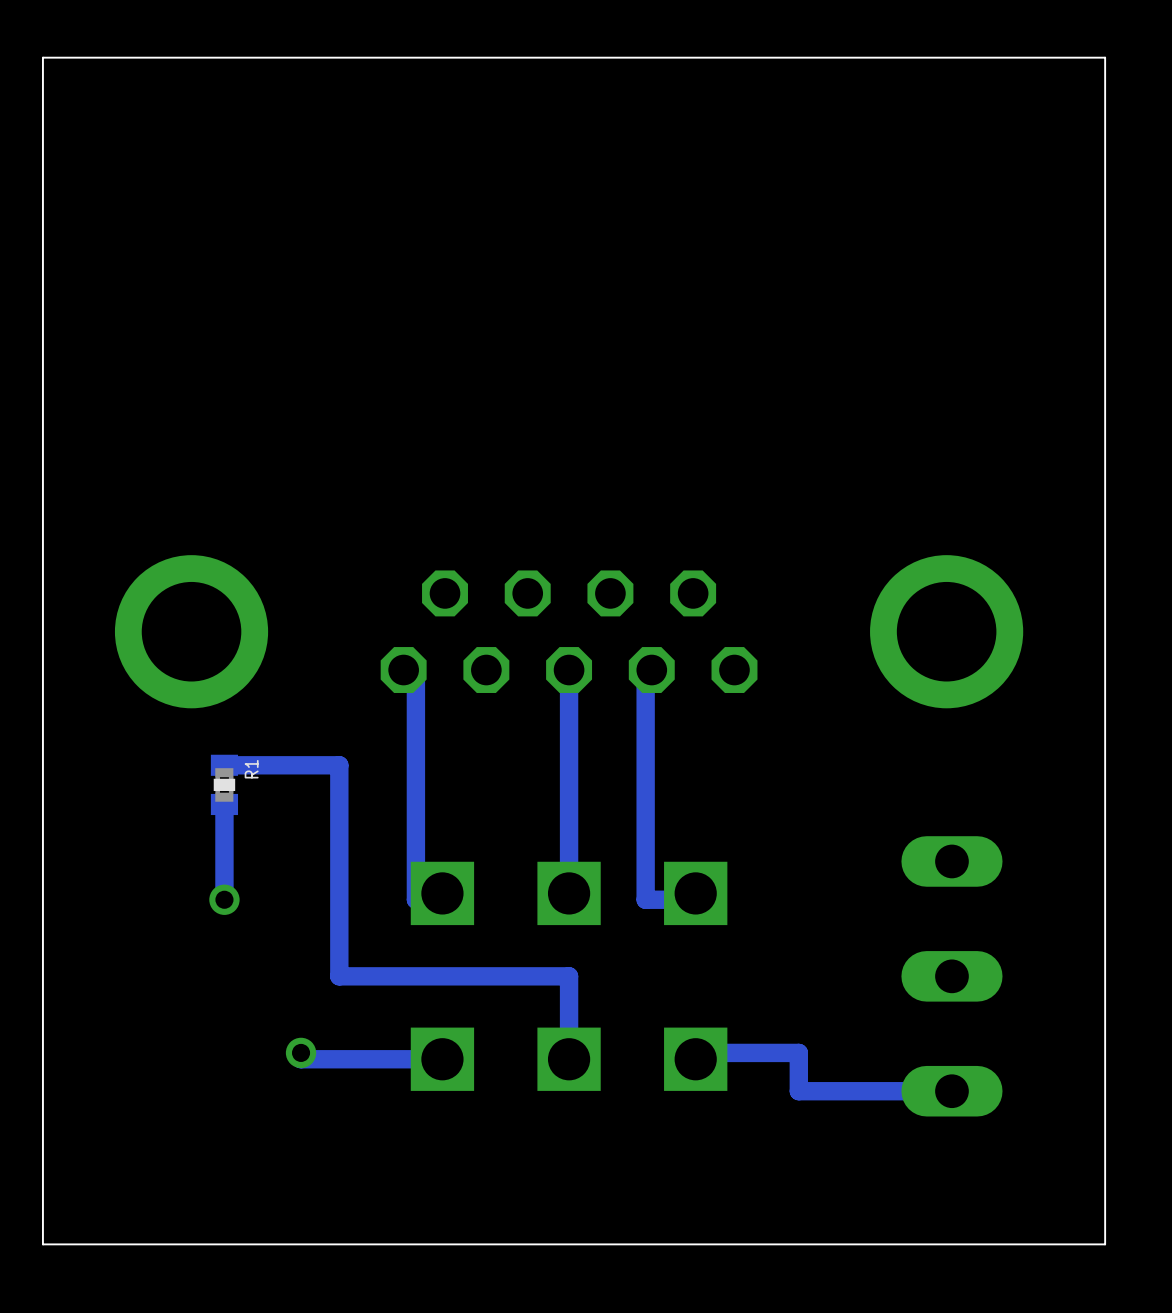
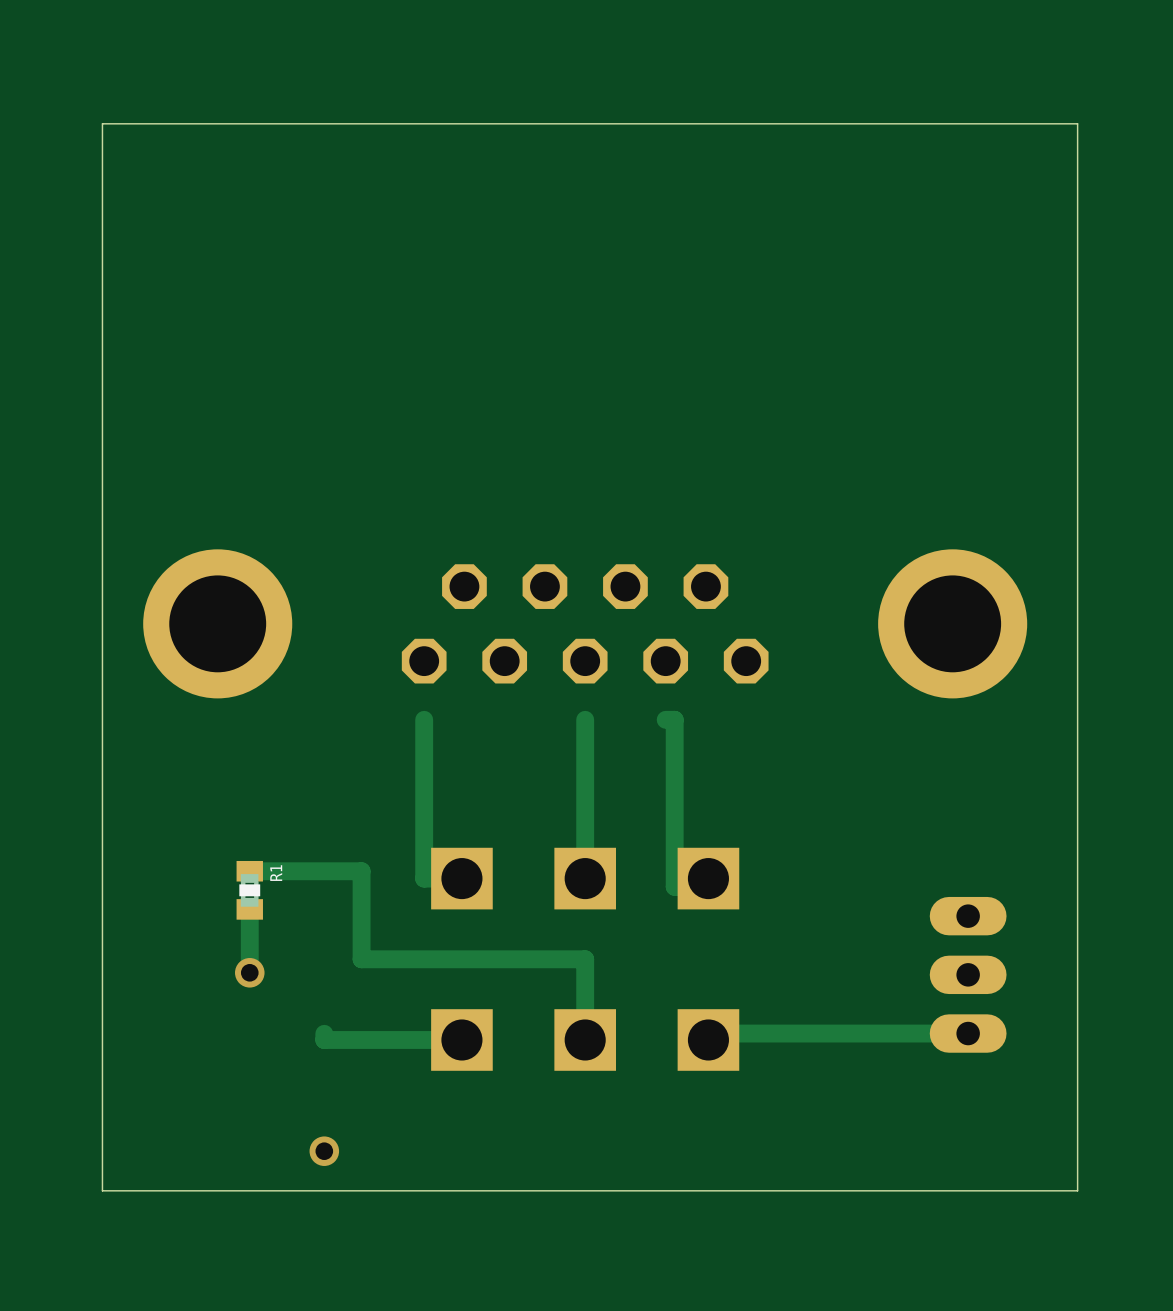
board edge: (1105, 57) (42, 57) (42, 1244) (1105, 1244) (1105, 57) -> (1077, 123) (1077, 1190) (102, 1190) (102, 123) (1077, 123)
track: (403, 670) (415, 670) (415, 899) (442, 899) (442, 893) -> (424, 719) (424, 878) (461, 878)
track: (569, 670) (569, 730) -> none
track: (651, 670) (645, 670) (645, 899) (695, 899) -> (665, 719) (674, 719) (674, 886) (708, 886) (708, 884)
track: (224, 765) (339, 765) (339, 885) -> (249, 871) (361, 871)
R1 position: (224, 784) -> (249, 890)
track: (224, 804) (224, 899) -> none
part footprint: [901, 836, 1003, 1117] -> [929, 896, 1007, 1053]
via: (224, 899) -> none
track: none -> (249, 909) (249, 972)
via: none -> (249, 972)
via: (301, 1052) -> none
track: (695, 1052) (798, 1052) (798, 1091) (951, 1091) -> (708, 1033) (968, 1033)
via: none -> (324, 1151)

